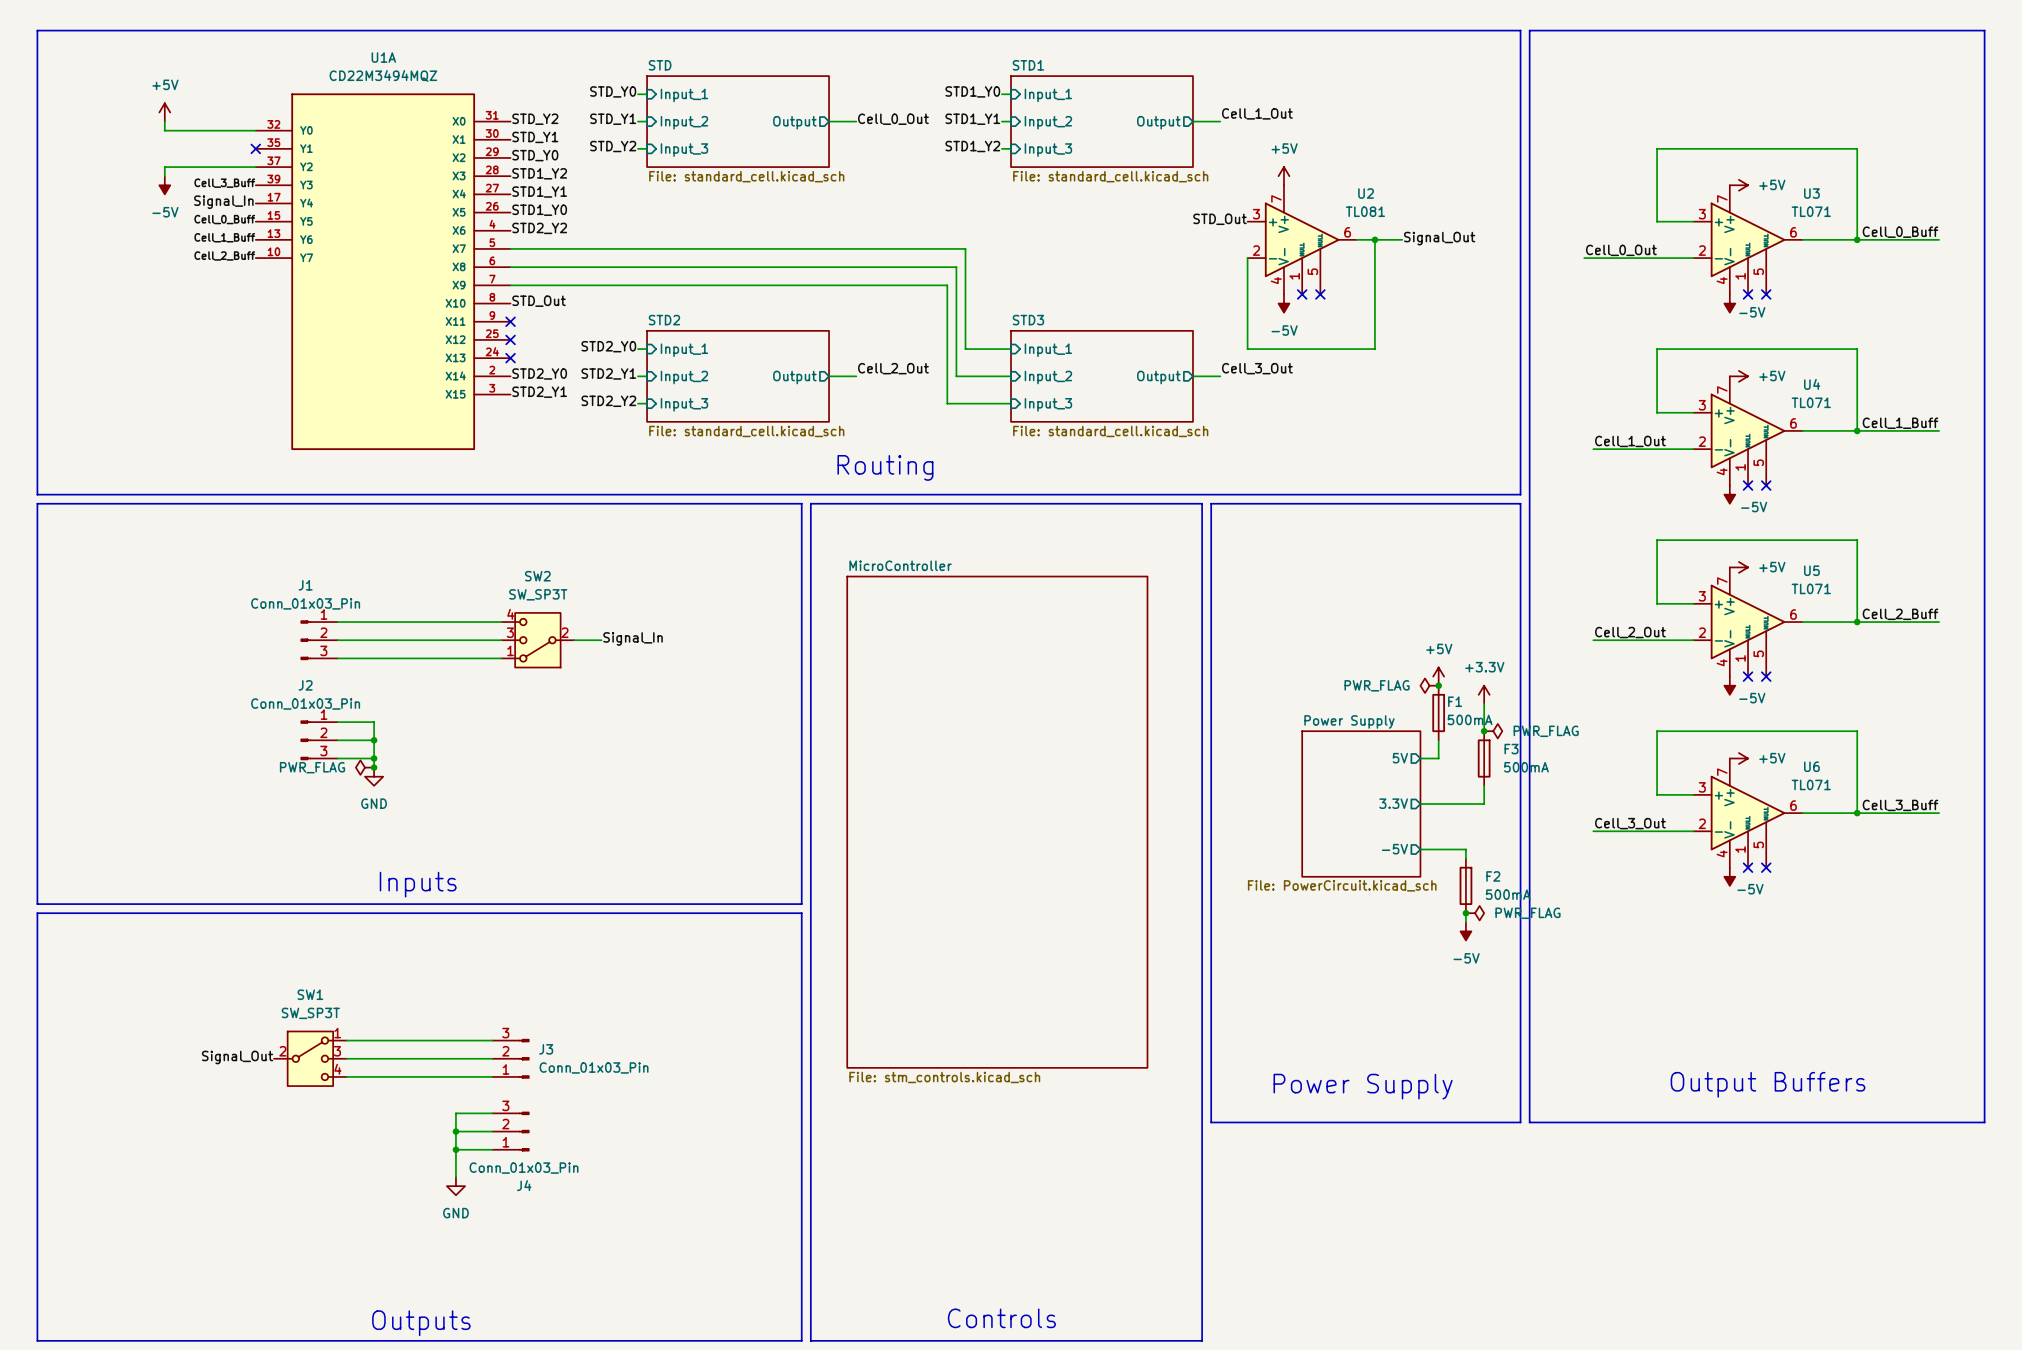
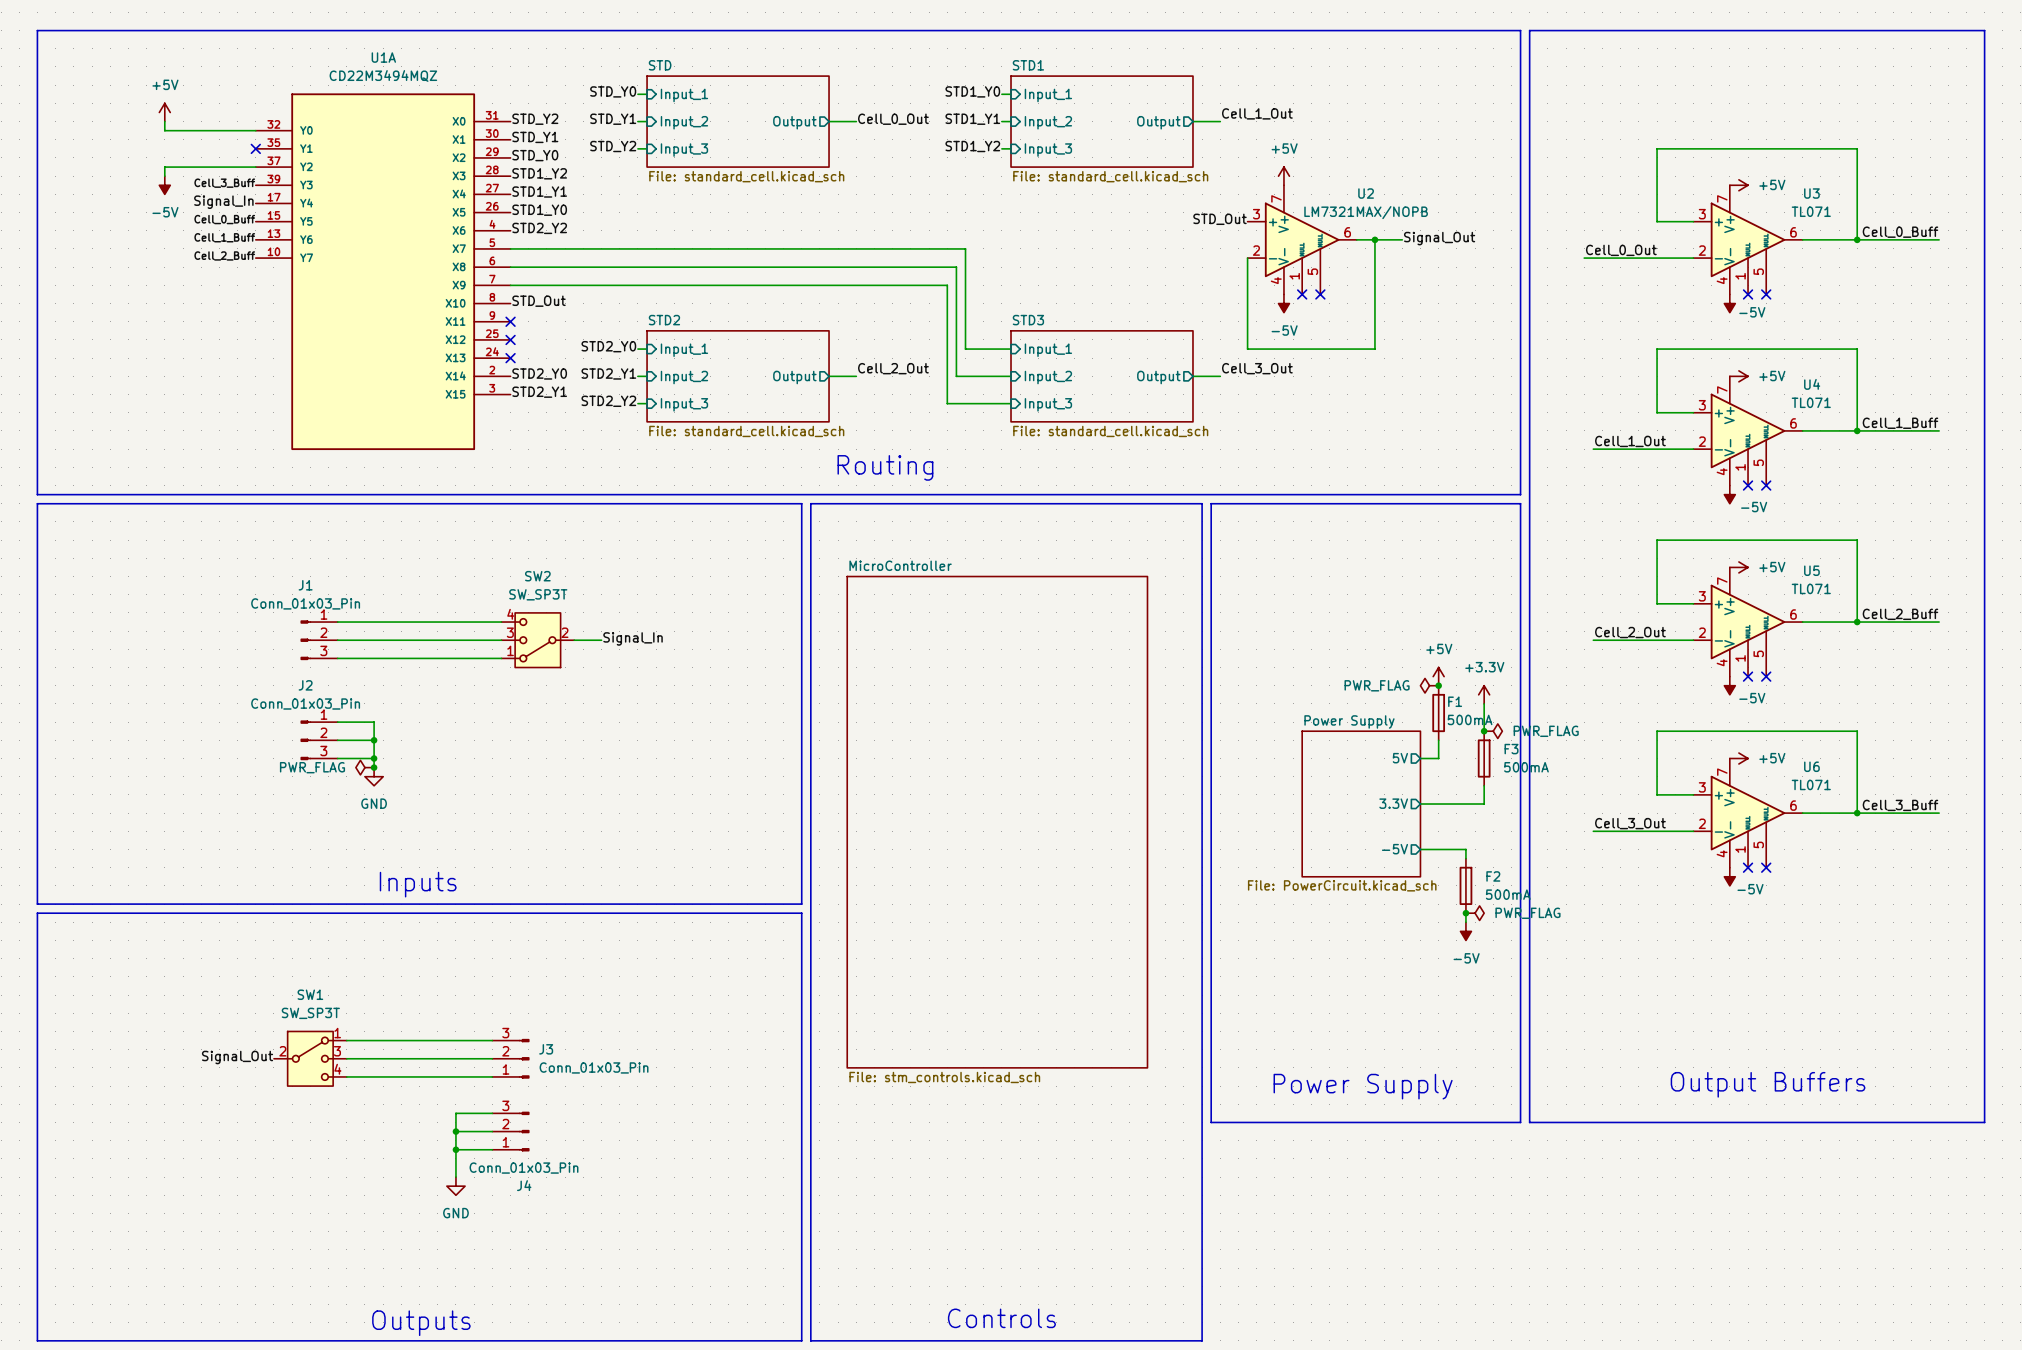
U2 value: TL081 (1365, 211) -> LM7321MAX/NOPB (1366, 212)

